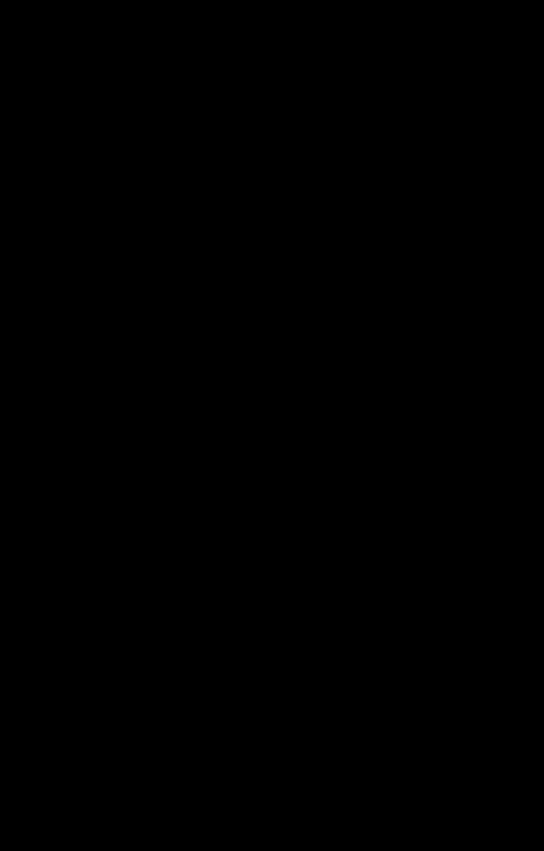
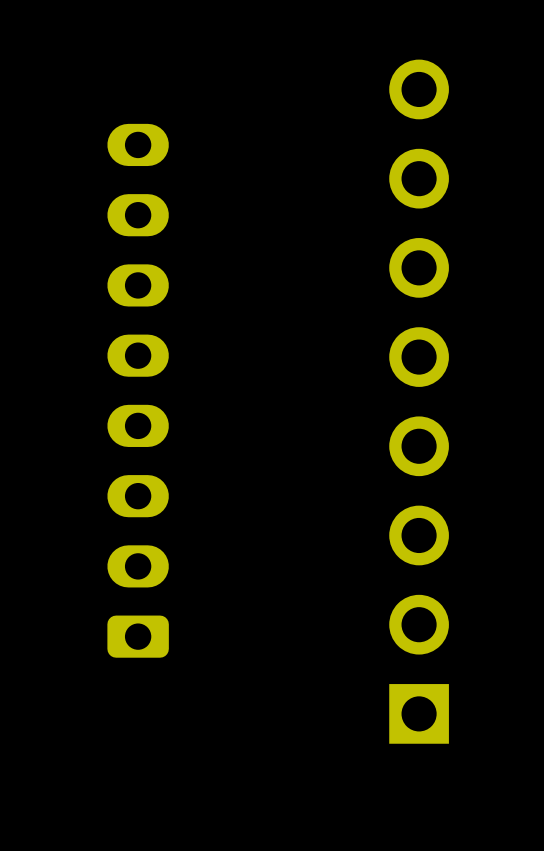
part: none -> (138, 390)
part: none -> (419, 401)

